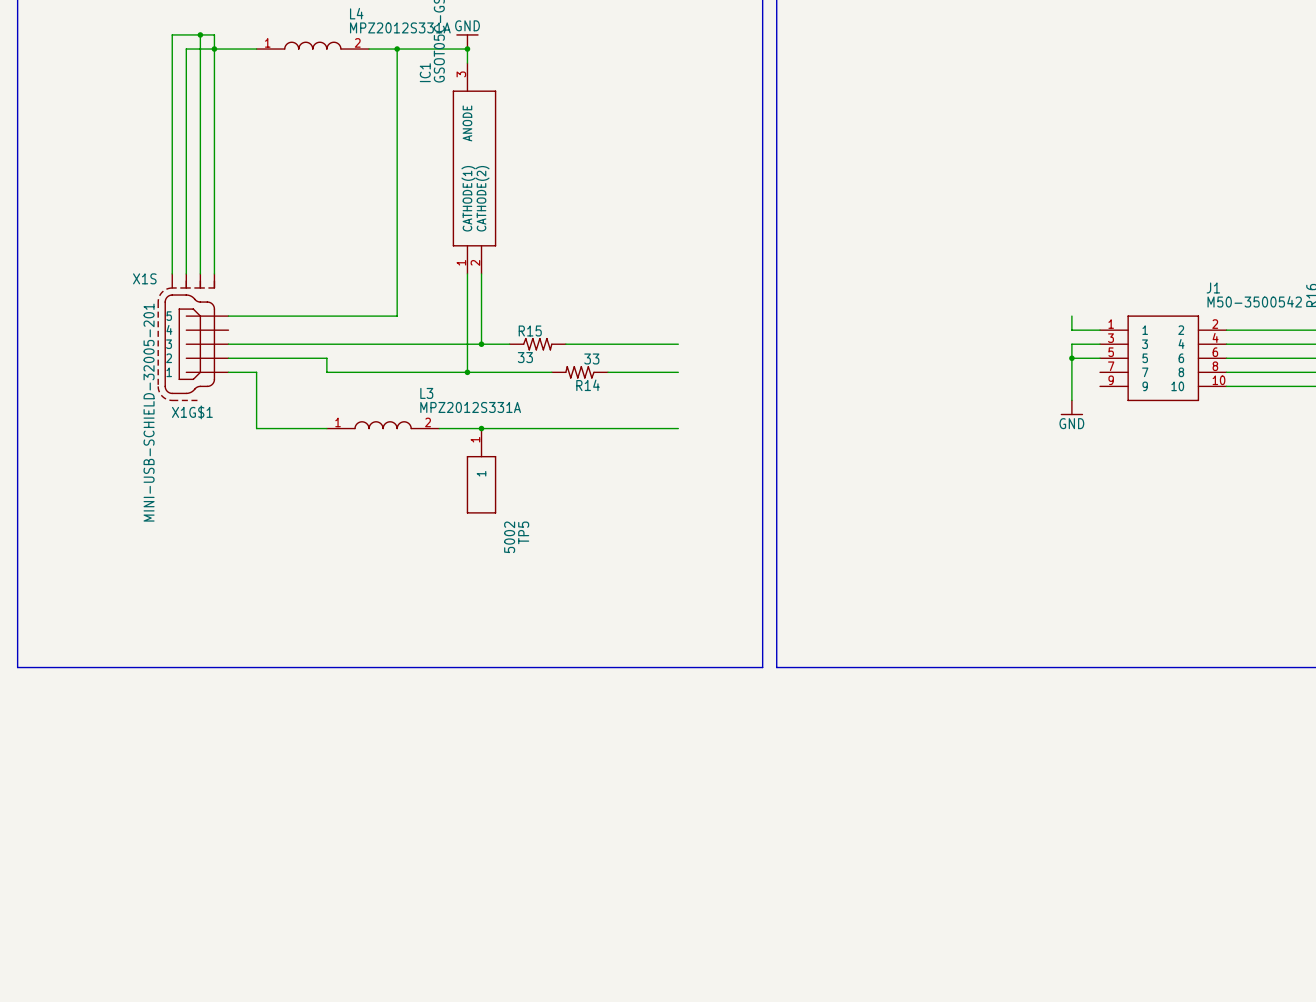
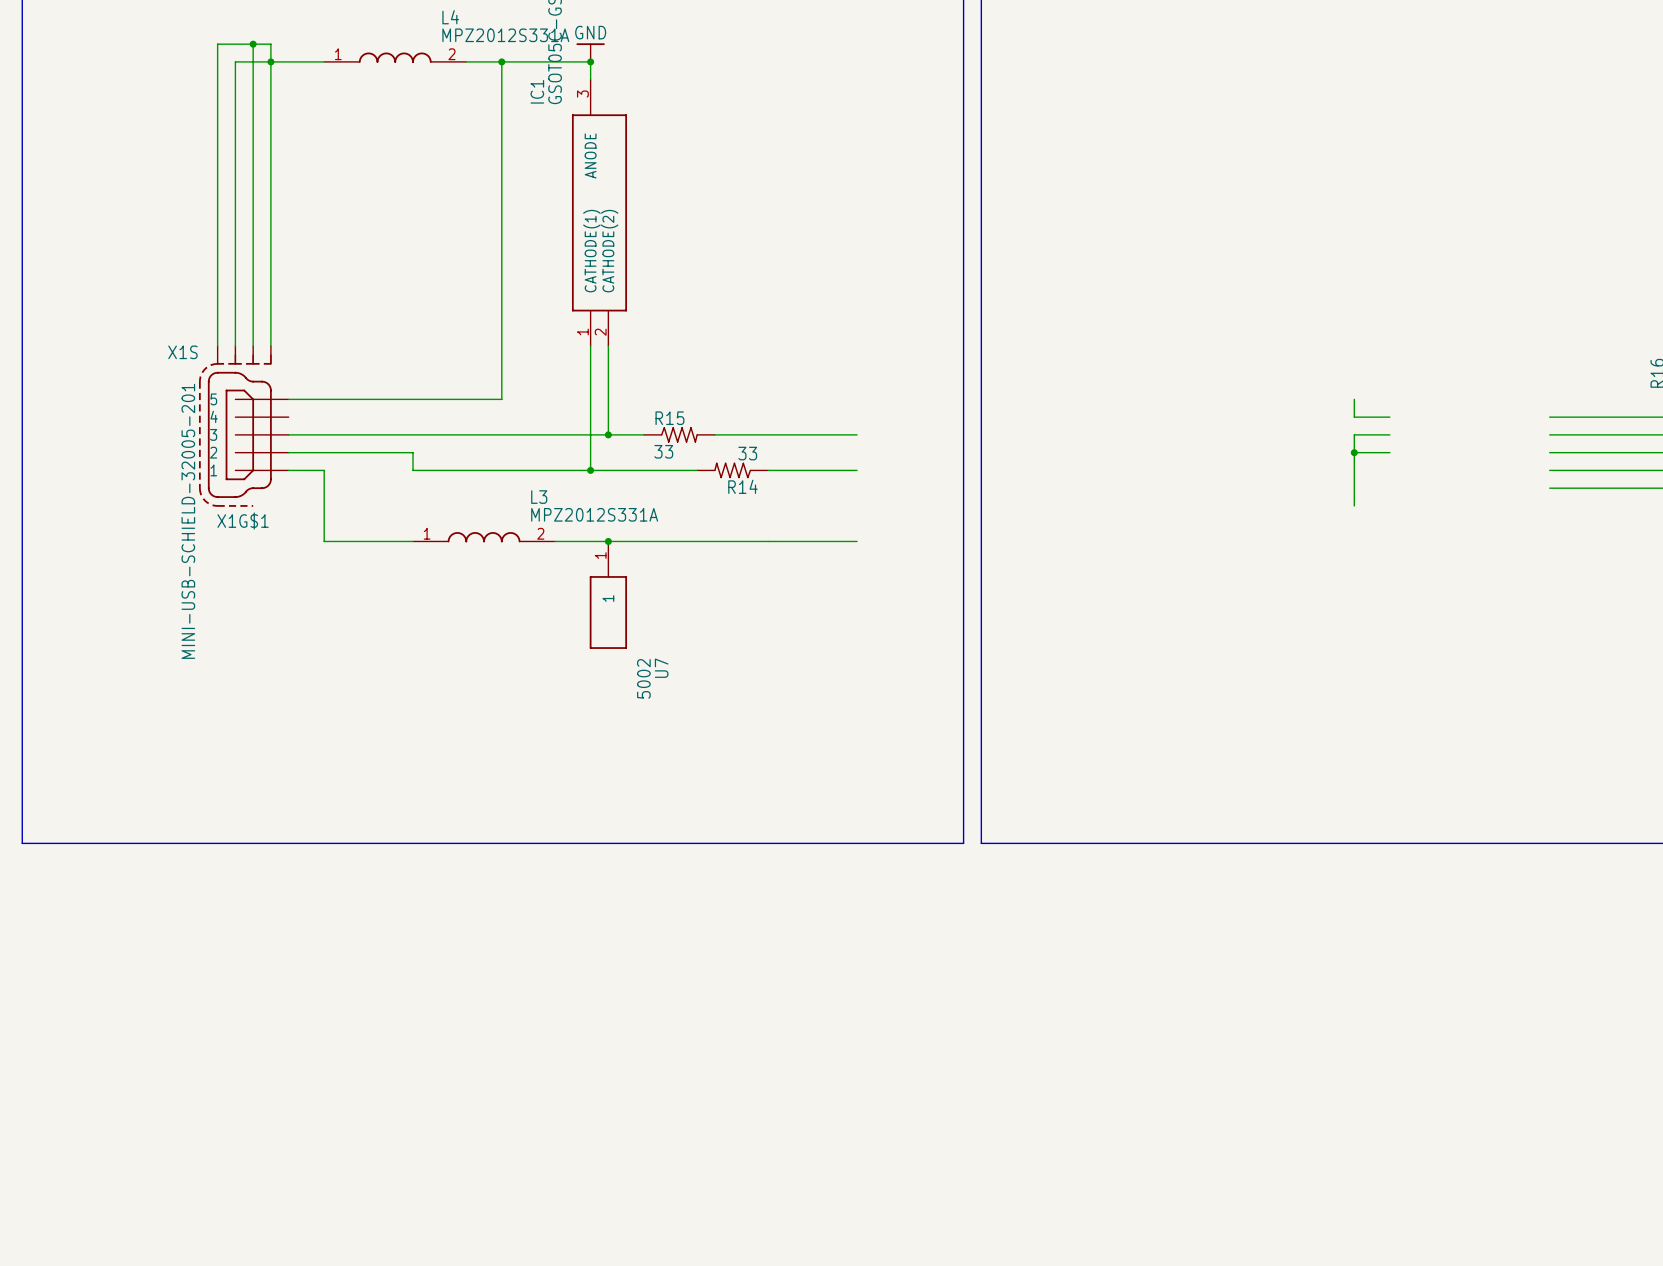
J1: M50-3500542 (1163, 358) -> none
power symbol: GND (1071, 407) -> none
TP5 name: TP5 (523, 532) -> U7 (661, 668)

